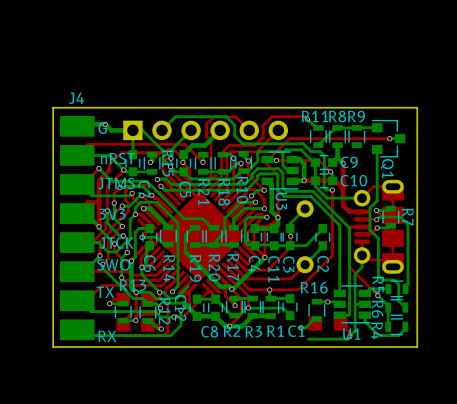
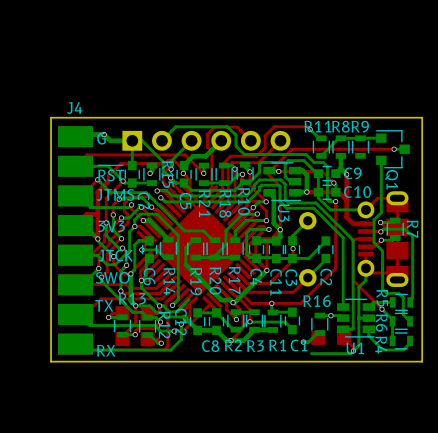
text: none -> ___ (110, 165)
text: nRST (118, 158) -> RST (111, 175)

